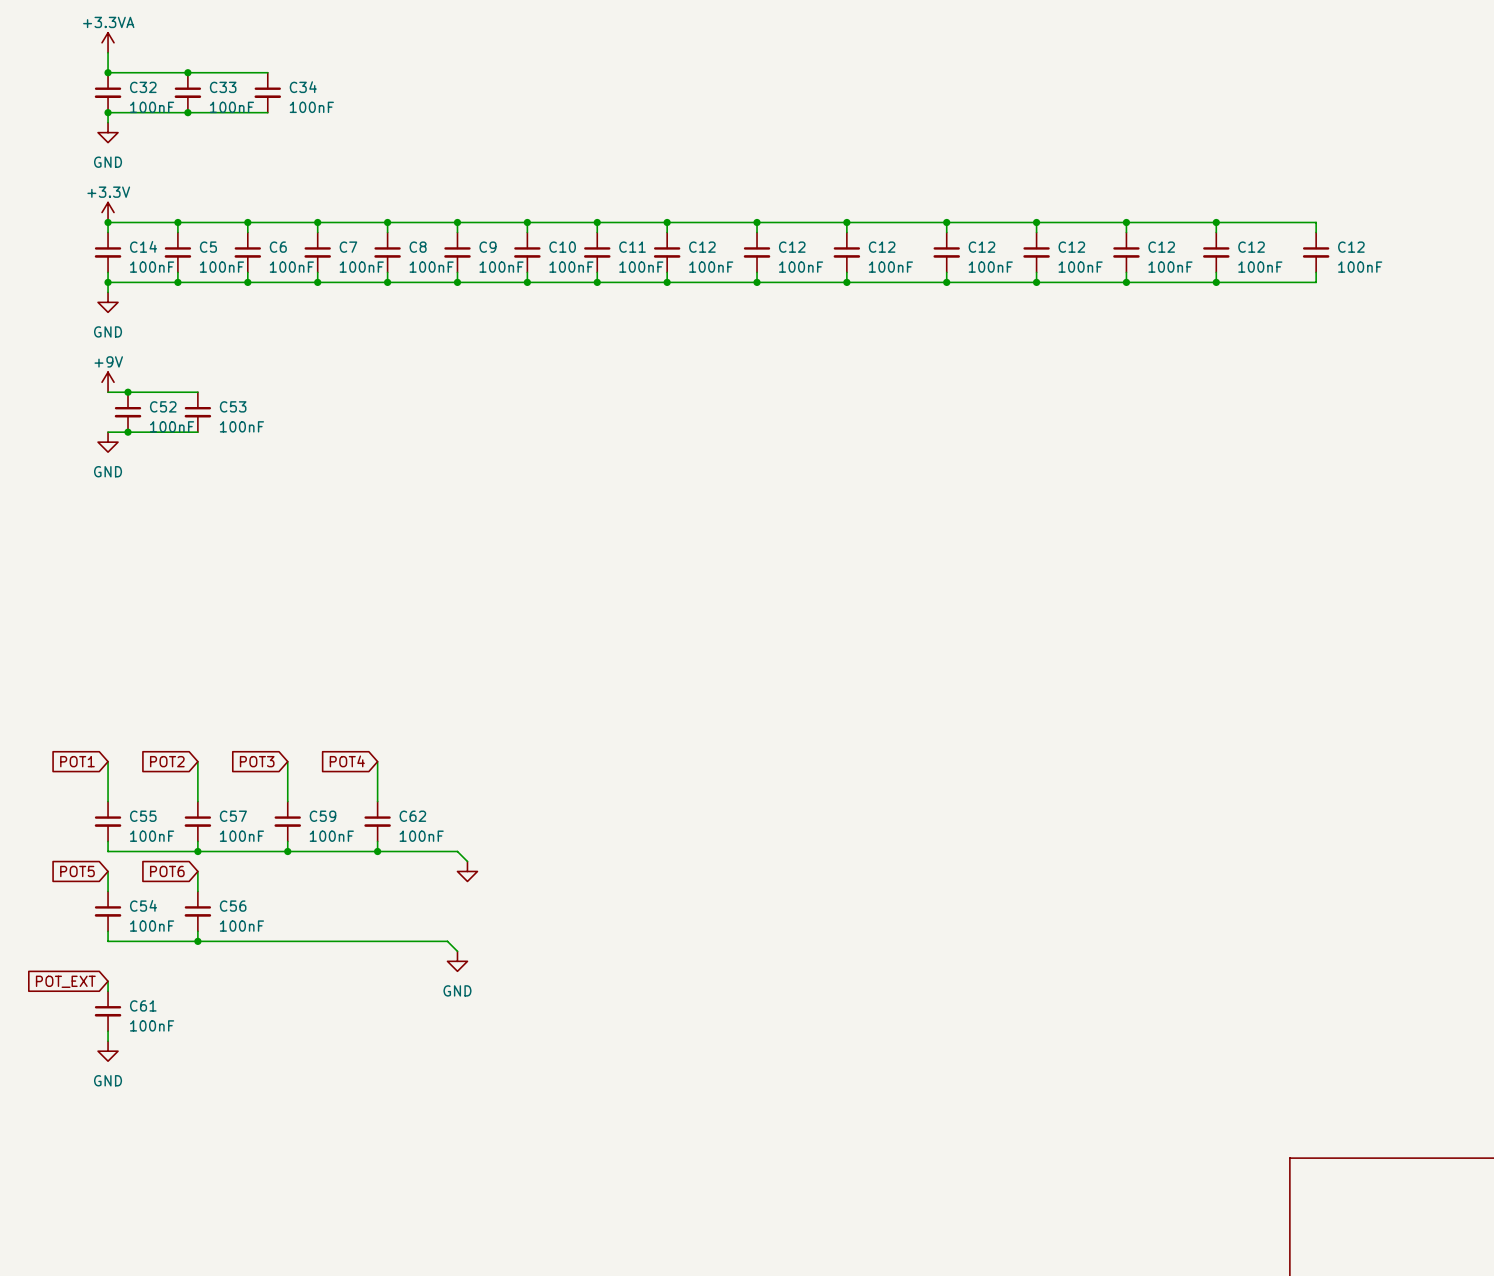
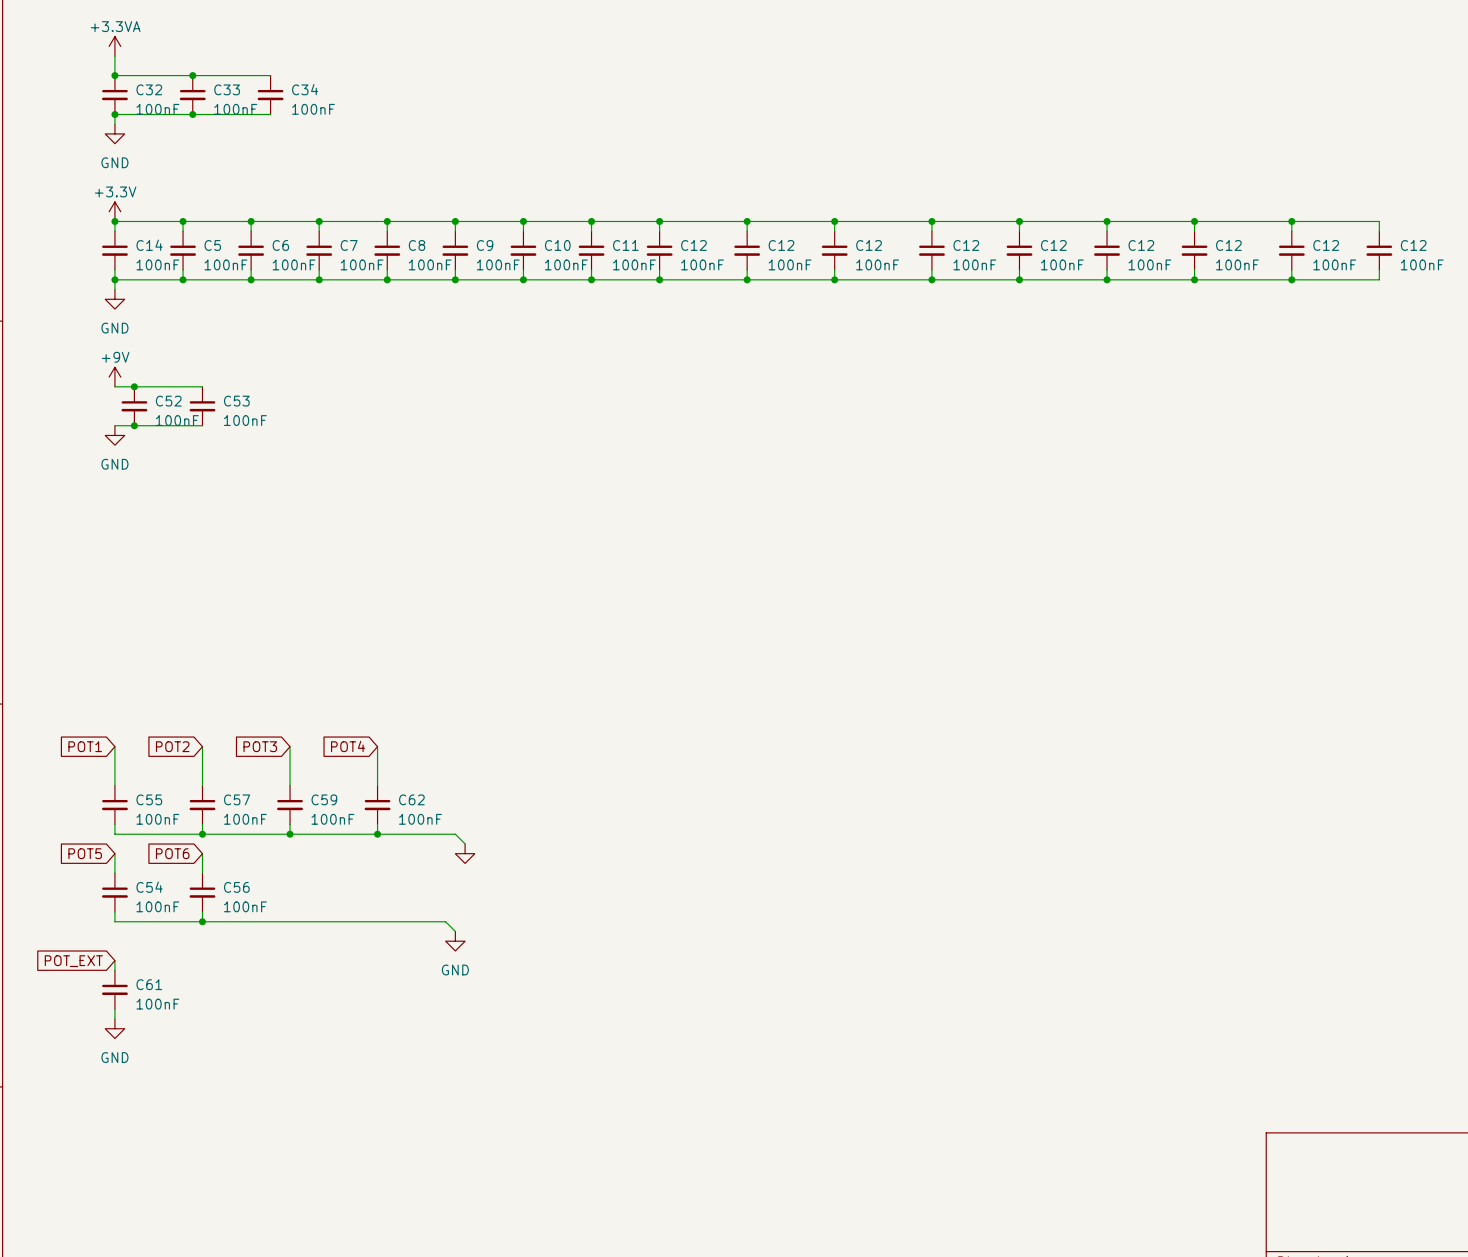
wire: none -> (1291, 221) (1379, 221) (1379, 231)
junction: none -> (1291, 221)
C12: none -> 100nF (1379, 250)
wire: none -> (1379, 270) (1379, 279) (1291, 279)
junction: none -> (1291, 279)

